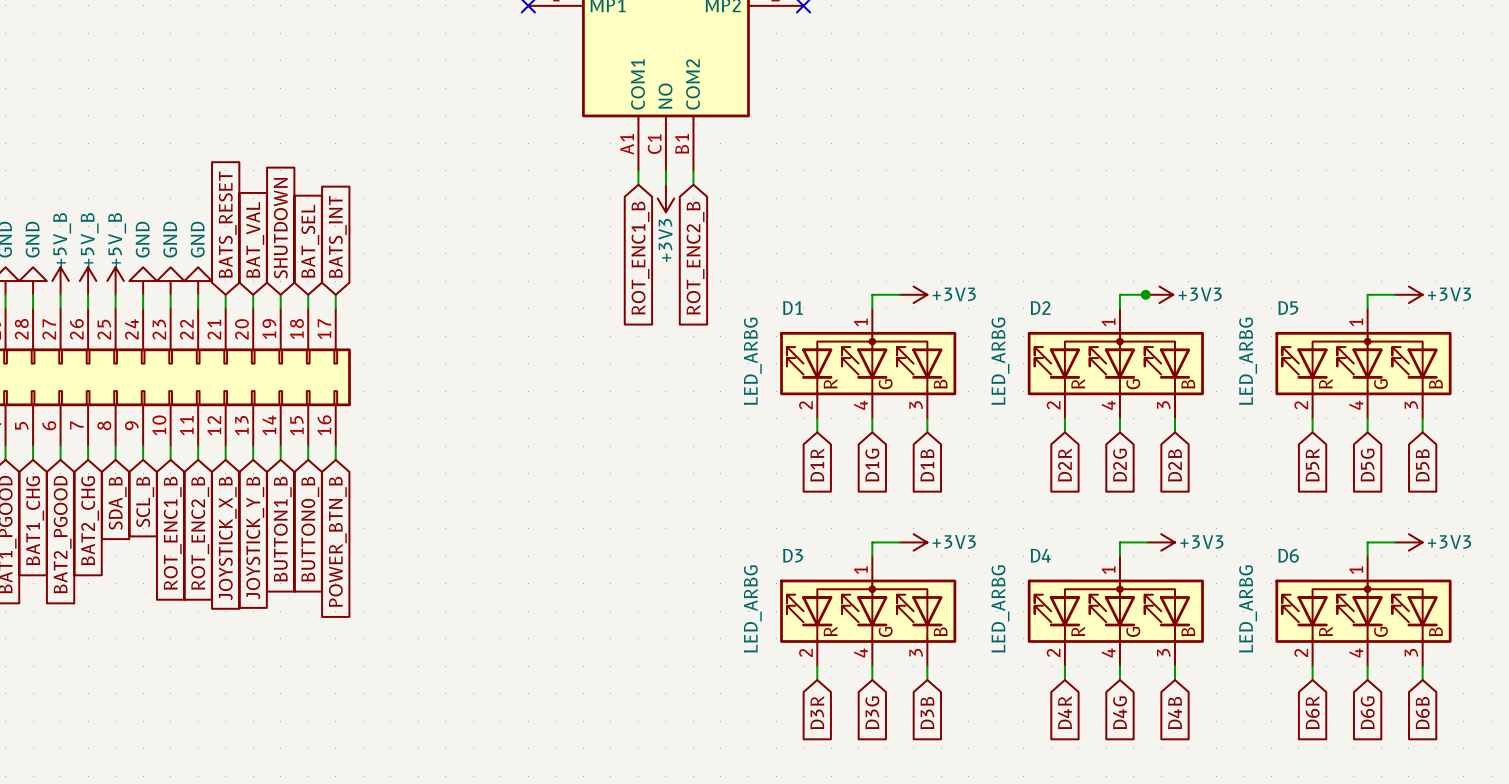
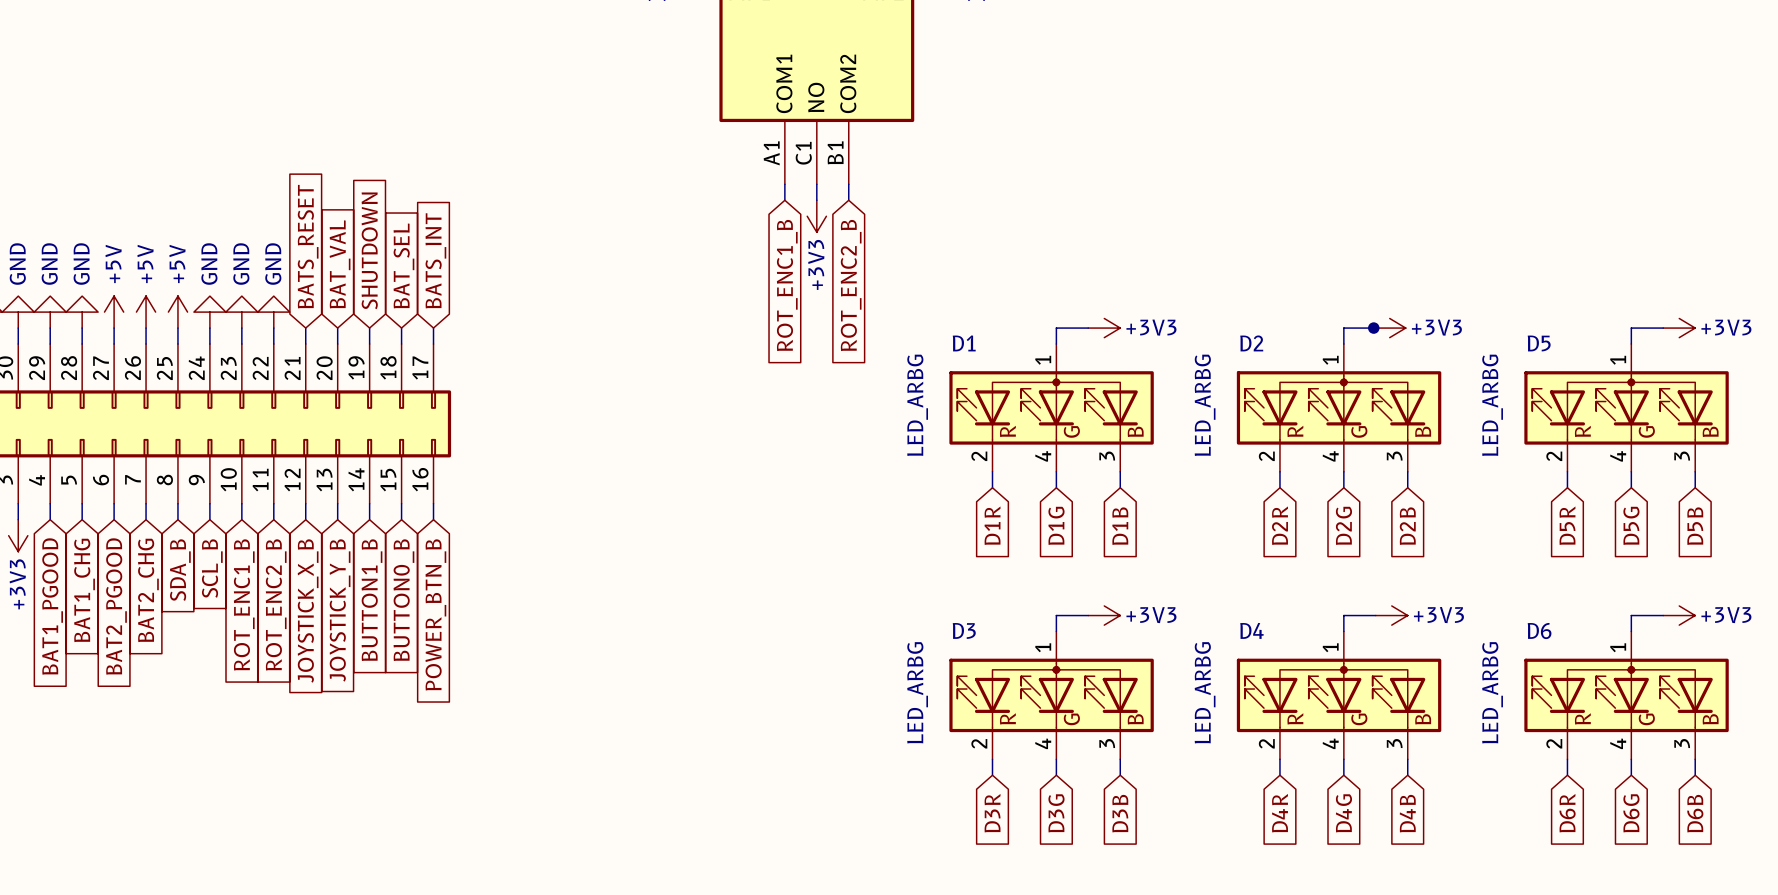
power symbol: +5V_B (60, 281) -> +5V (114, 312)
power symbol: +5V_B (88, 281) -> +5V (146, 312)
power symbol: +5V_B (115, 281) -> +5V (177, 312)

